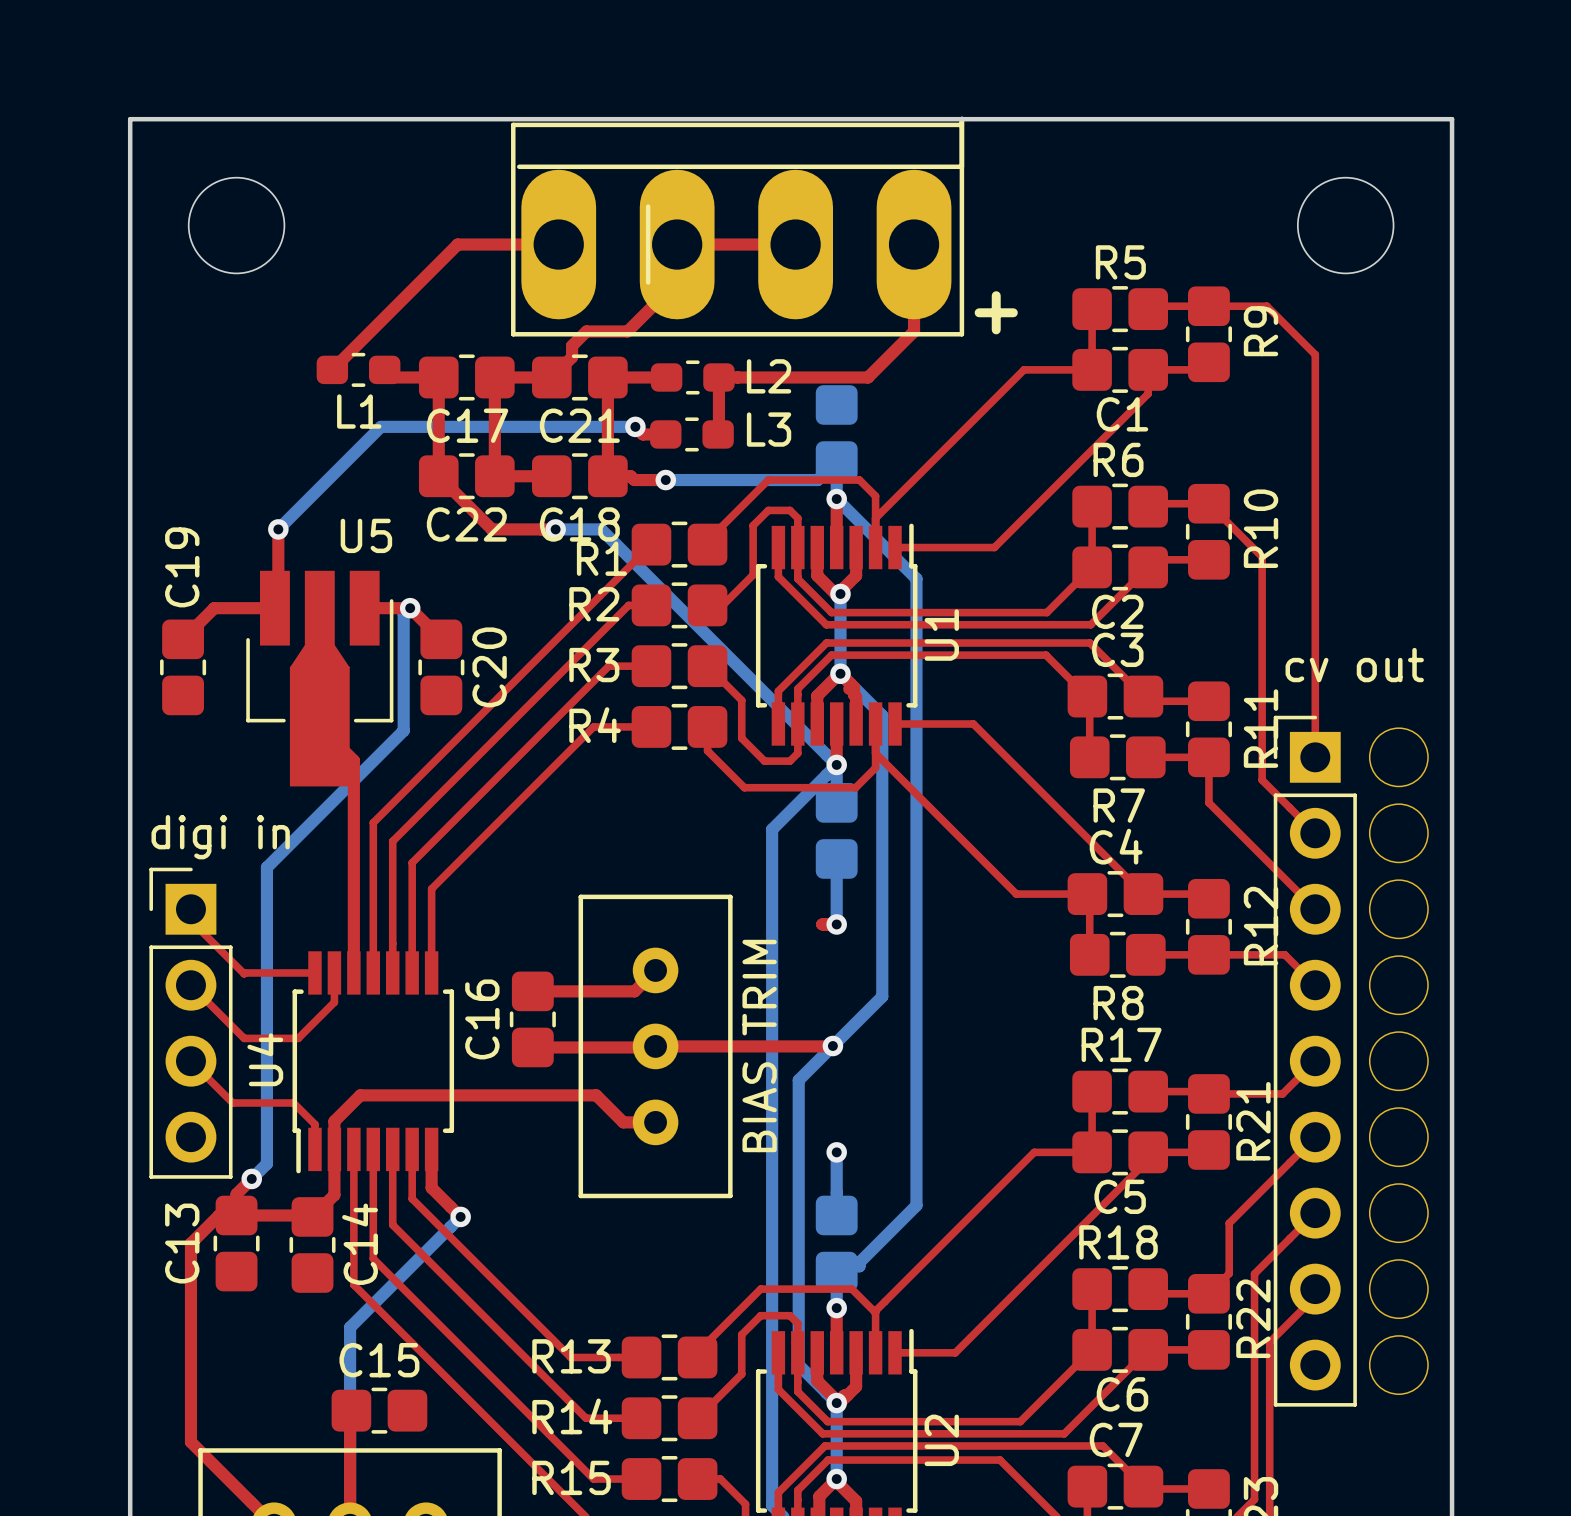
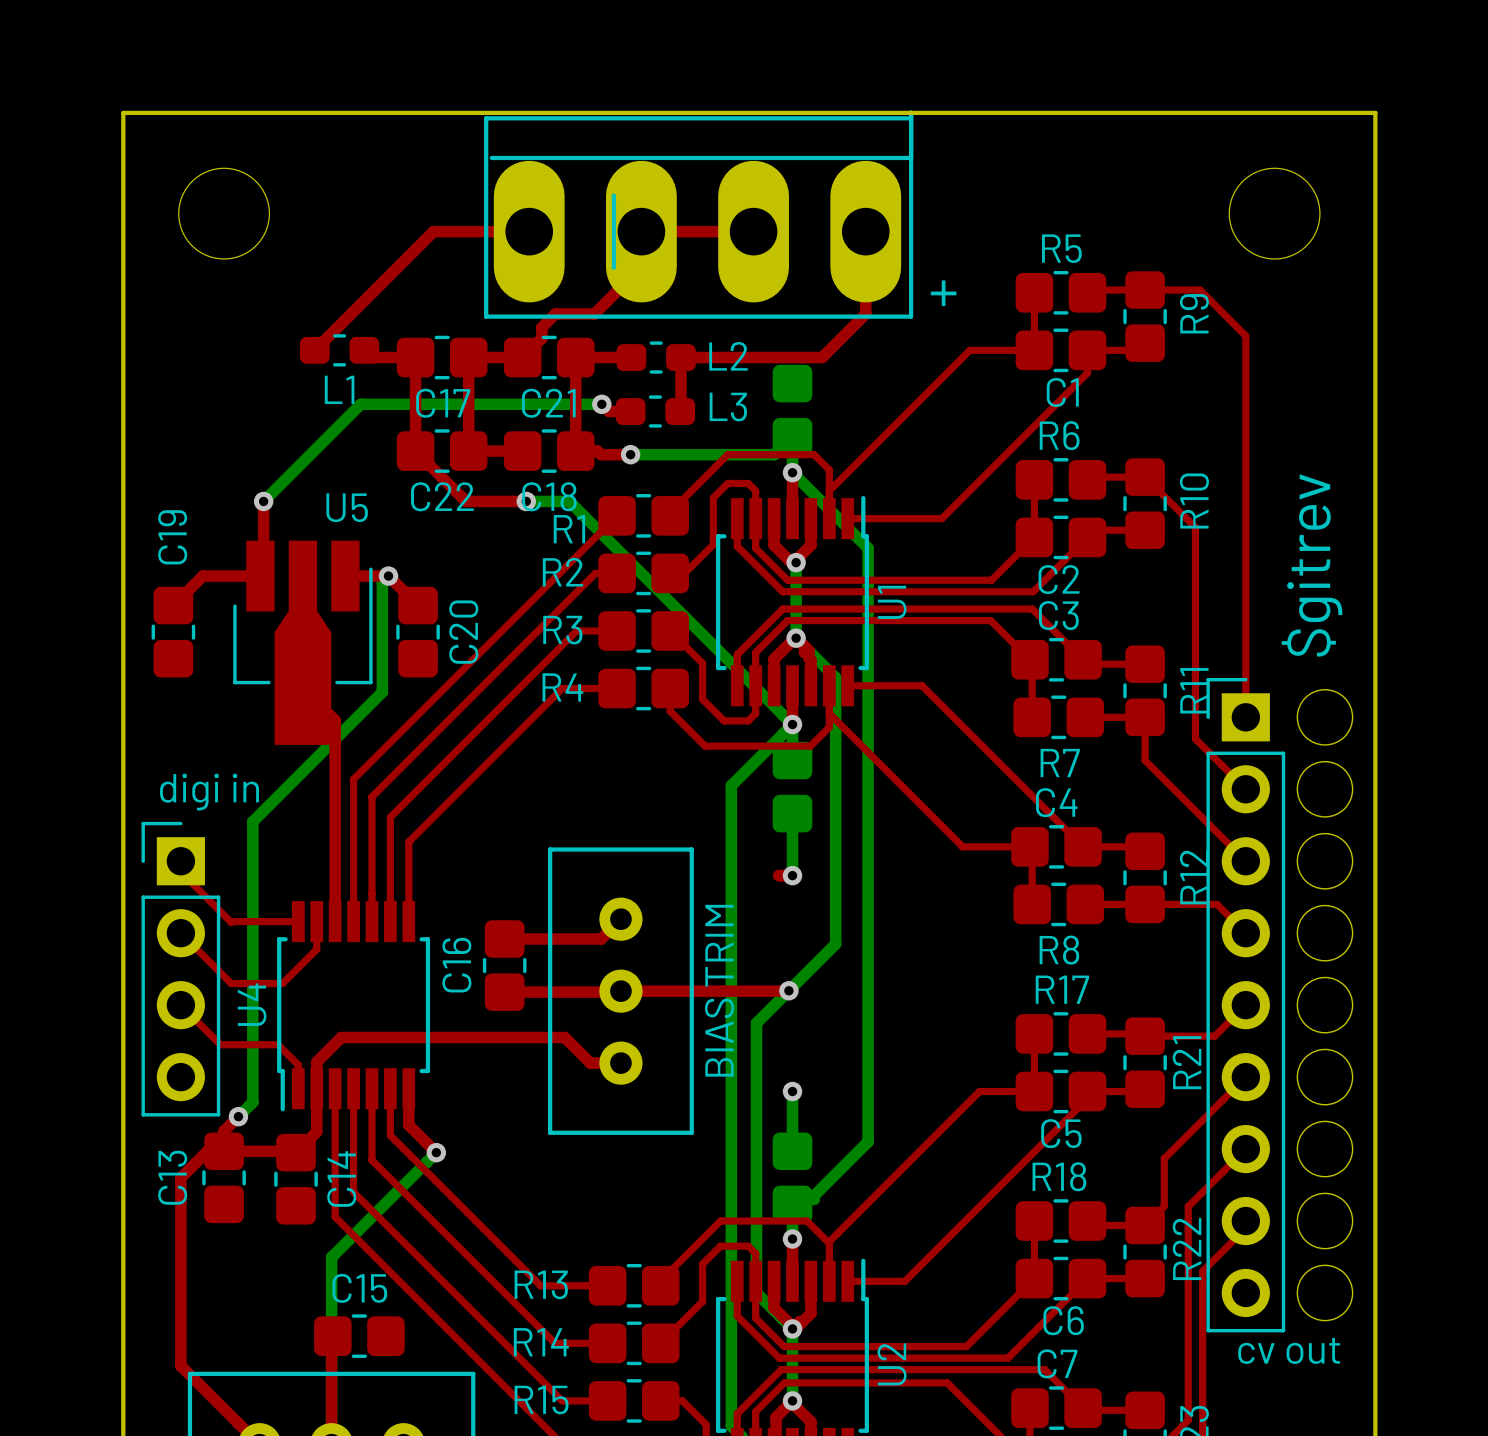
text: none -> $gitrev (1312, 565)
part value position: cv out (1354, 665) -> cv out (1289, 1350)

